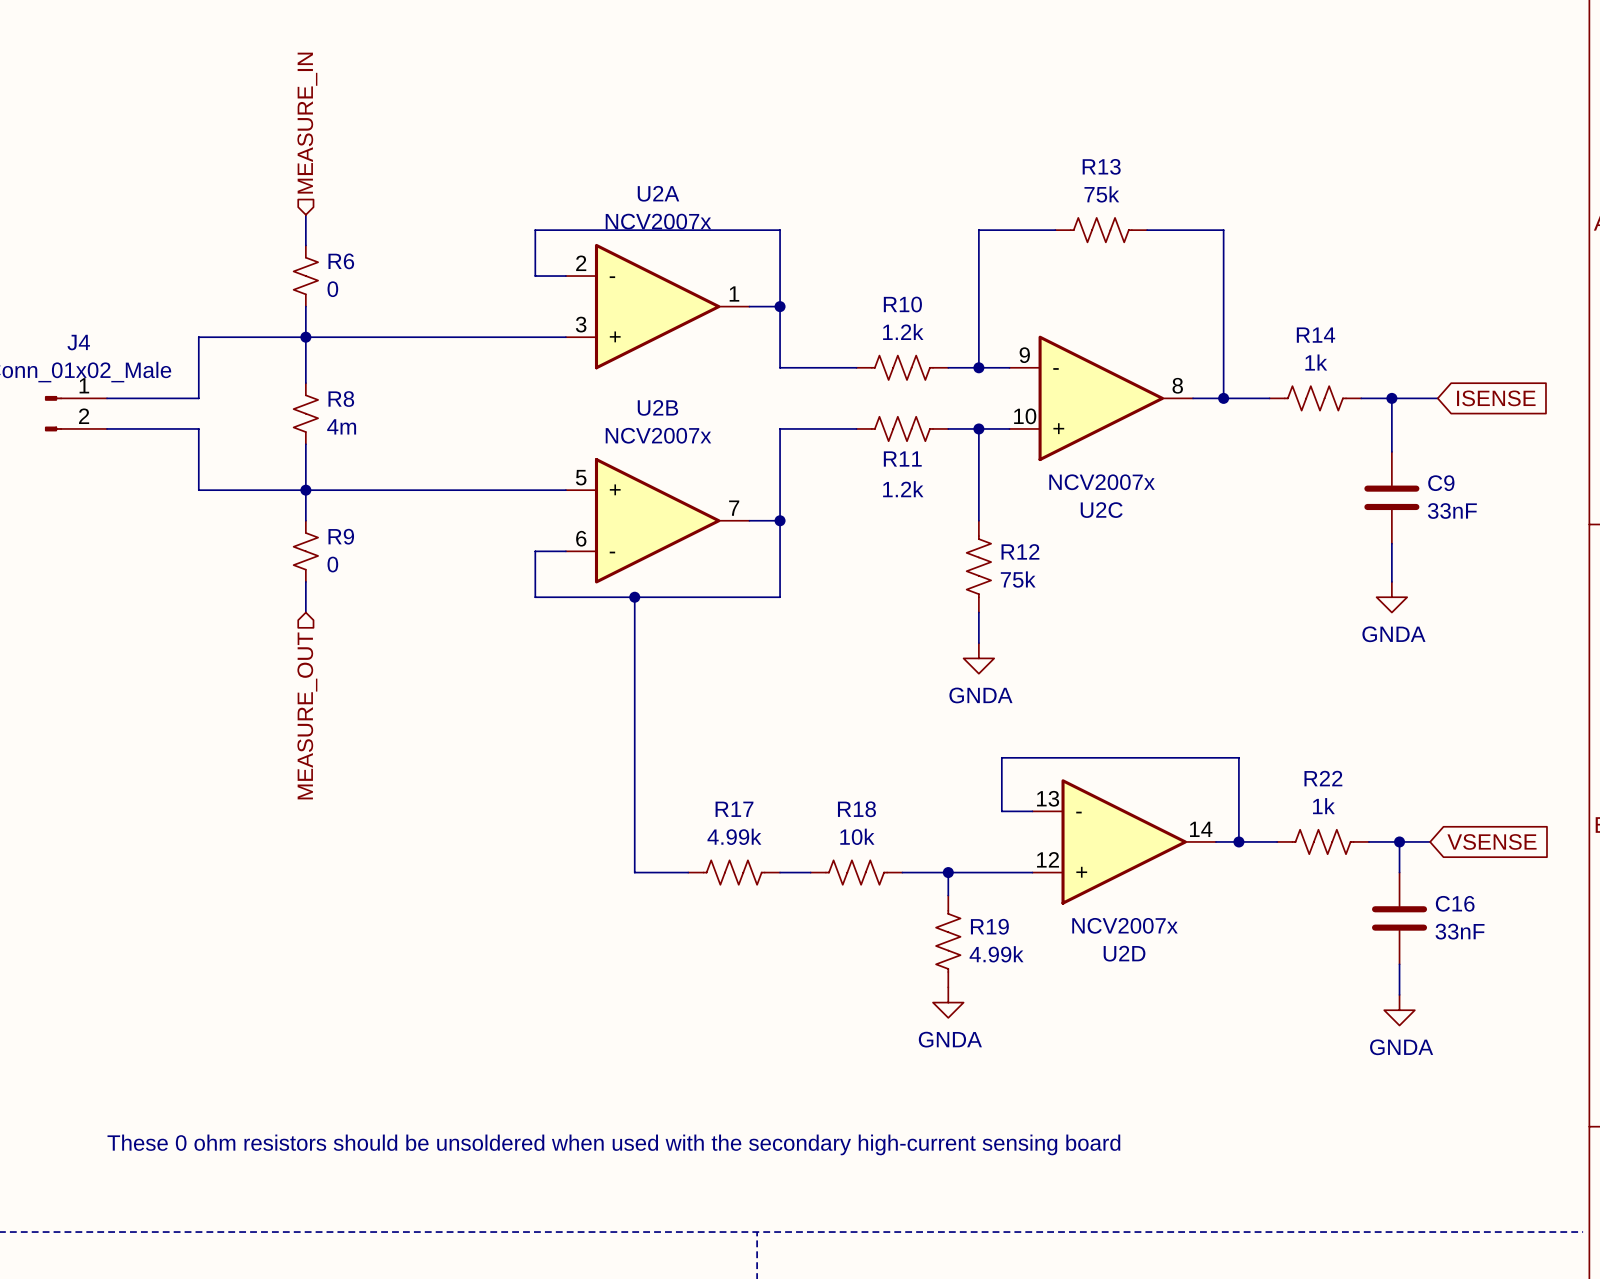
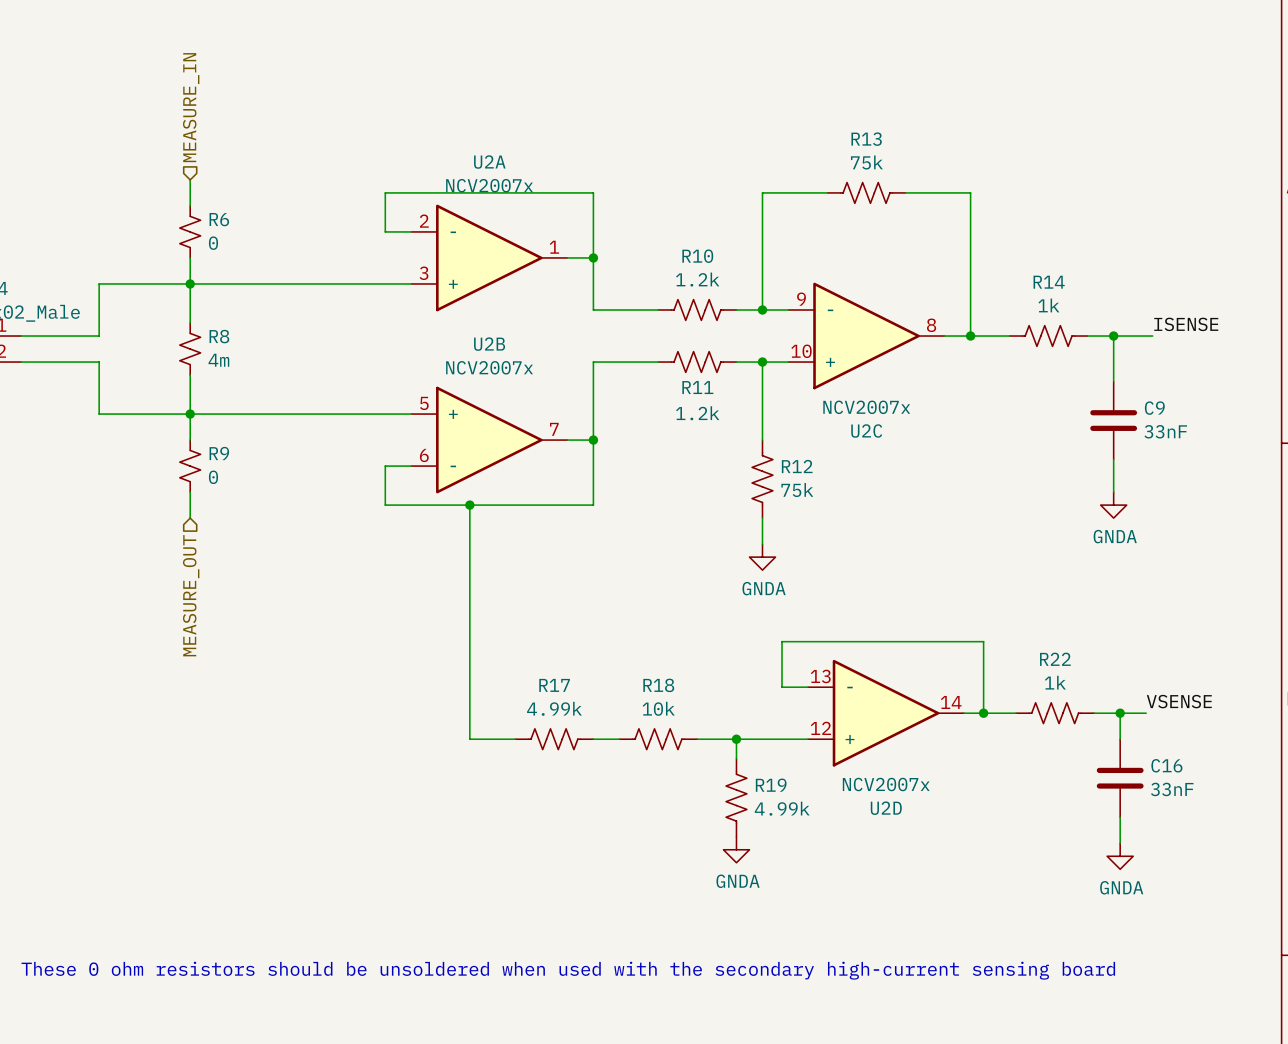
label: none -> ISENSE (1186, 324)
global label: ISENSE (1496, 398) -> none
label: none -> VSENSE (1179, 701)
global label: VSENSE (1492, 841) -> none

